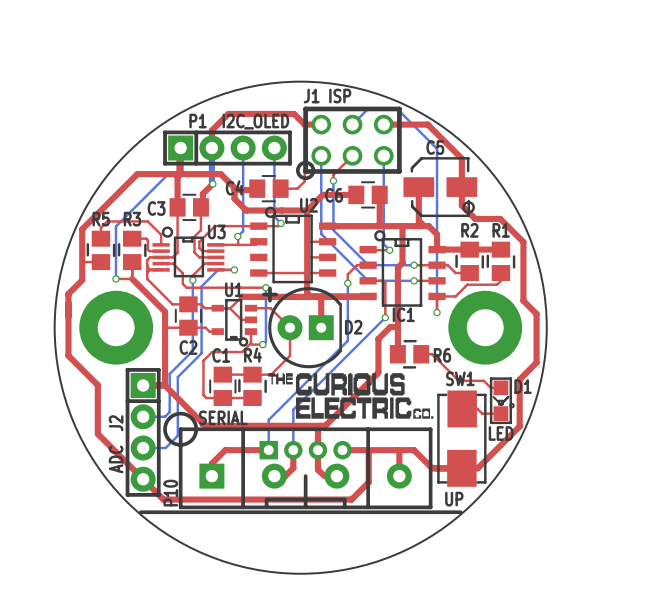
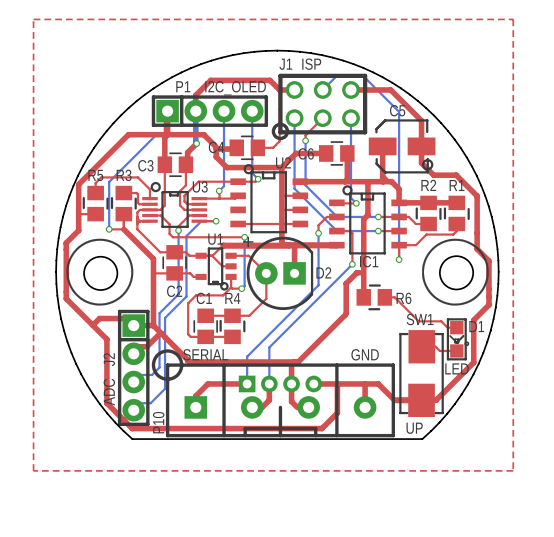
top zone outline: none -> (33, 19) (33, 470) (513, 470) (513, 19) (33, 19)
part: none -> (277, 244)
part: (300, 327) -> none
bottom track: (171, 371) (169, 373) (169, 412) (165, 416) (143, 416) -> (159, 313) (159, 367) (152, 374) (130, 374)
drawing: [268, 373, 434, 419] -> none
top track: (97, 385) (97, 433) (163, 499) -> (130, 318) (99, 318) (92, 325) (106, 339) (106, 403) (132, 428) (152, 428)
top track: none -> (161, 333) (146, 346) (130, 346)
text: none -> GND (365, 354)
bottom track: (177, 435) (165, 448) (143, 448) -> (165, 371) (165, 388) (150, 403) (130, 403)

